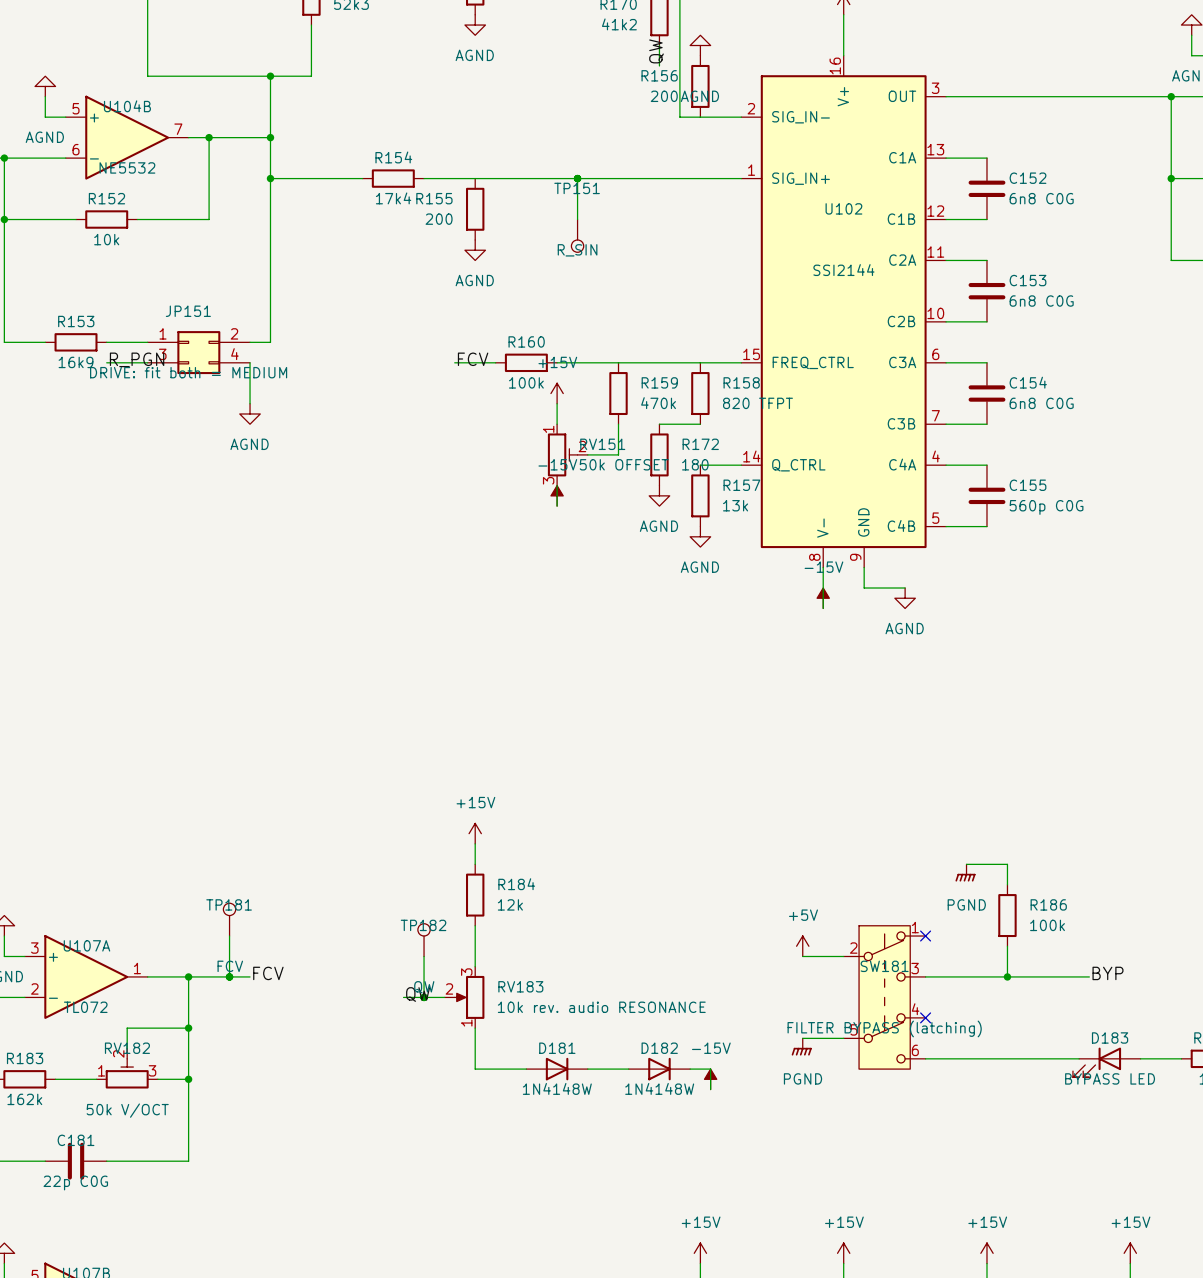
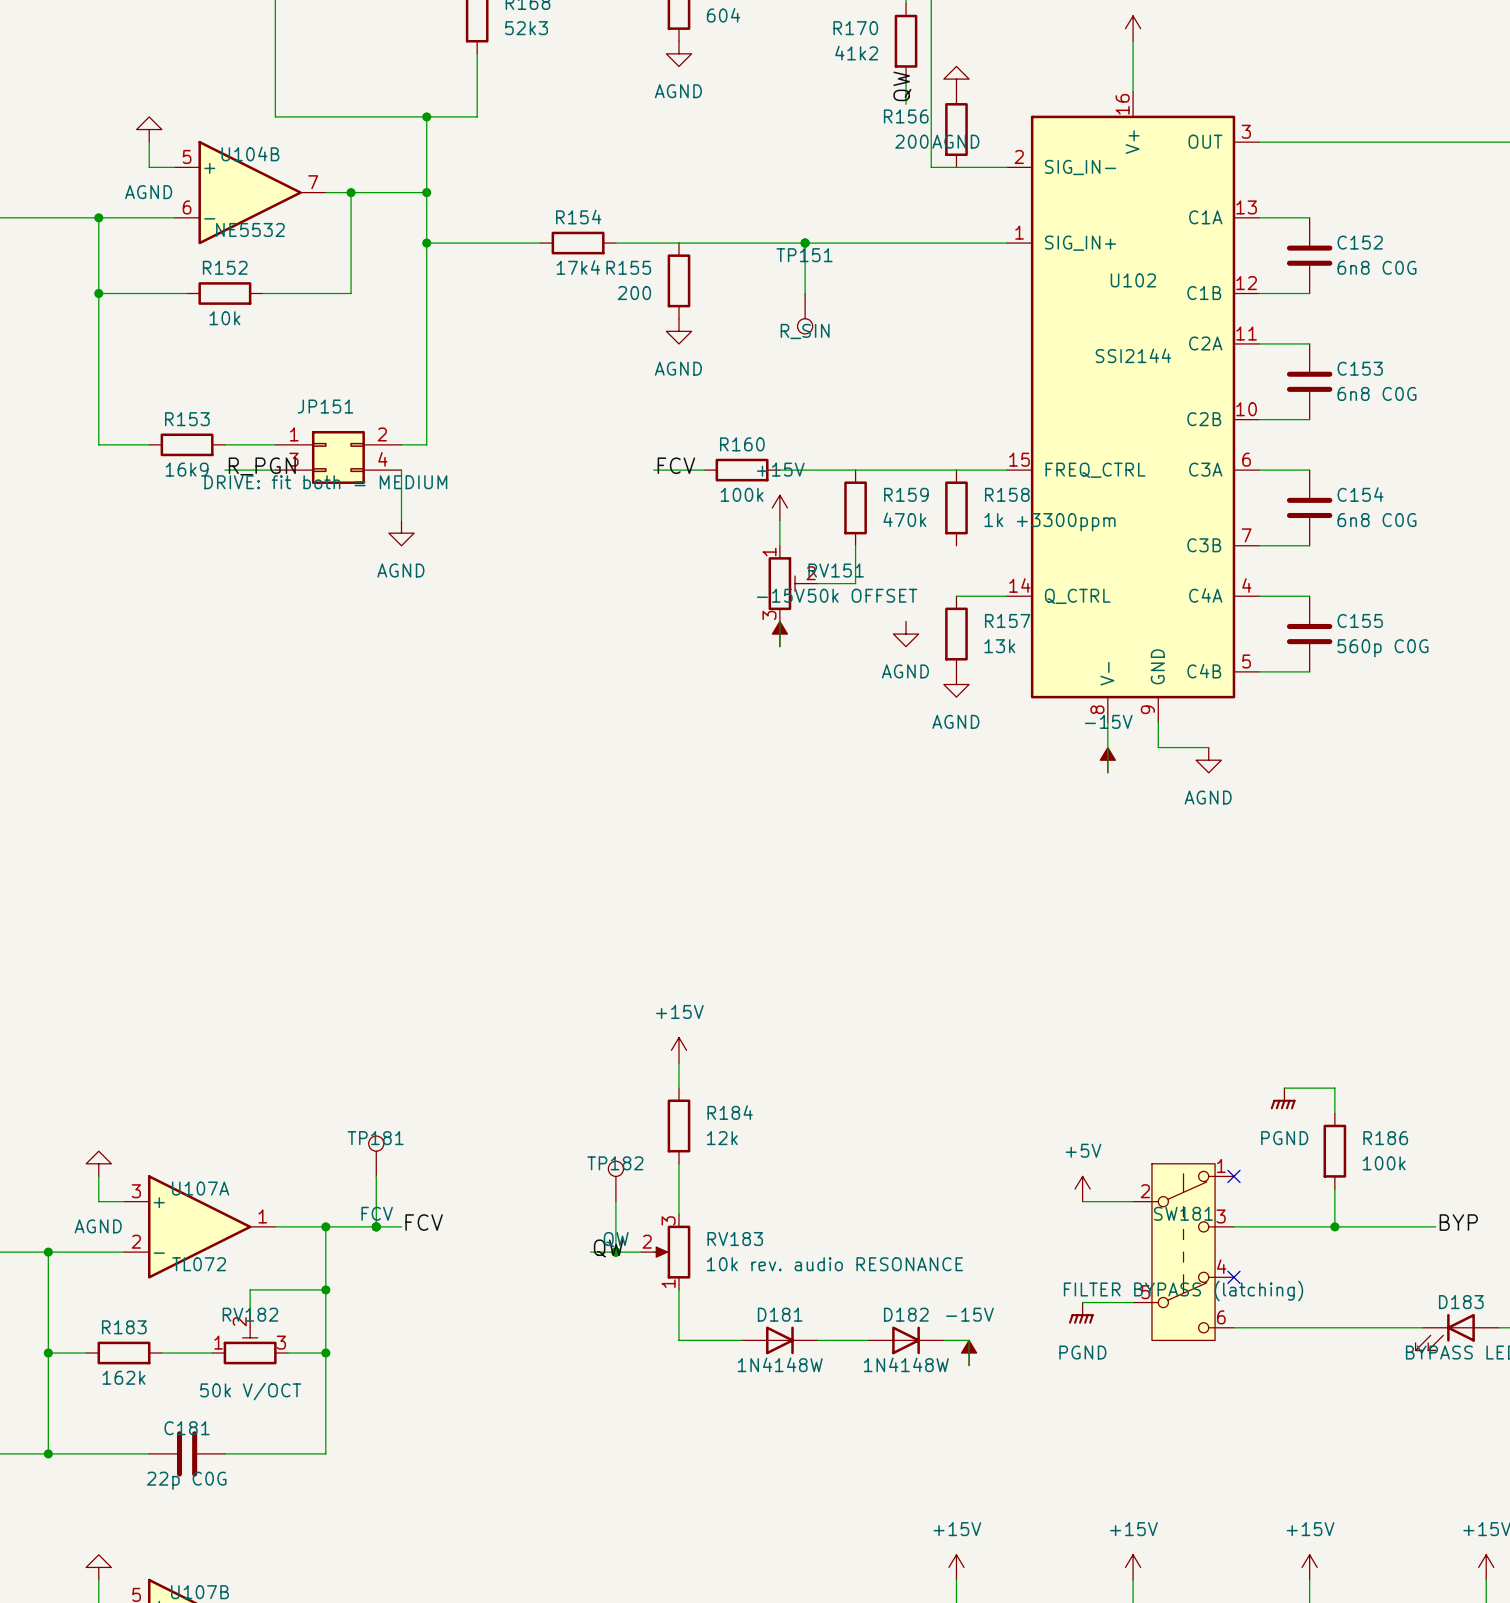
R158 value: 820 TFPT (757, 403) -> 1k +3300ppm (1049, 522)
wire: (659, 424) (700, 424) -> none
R172: 180 (659, 454) -> none

